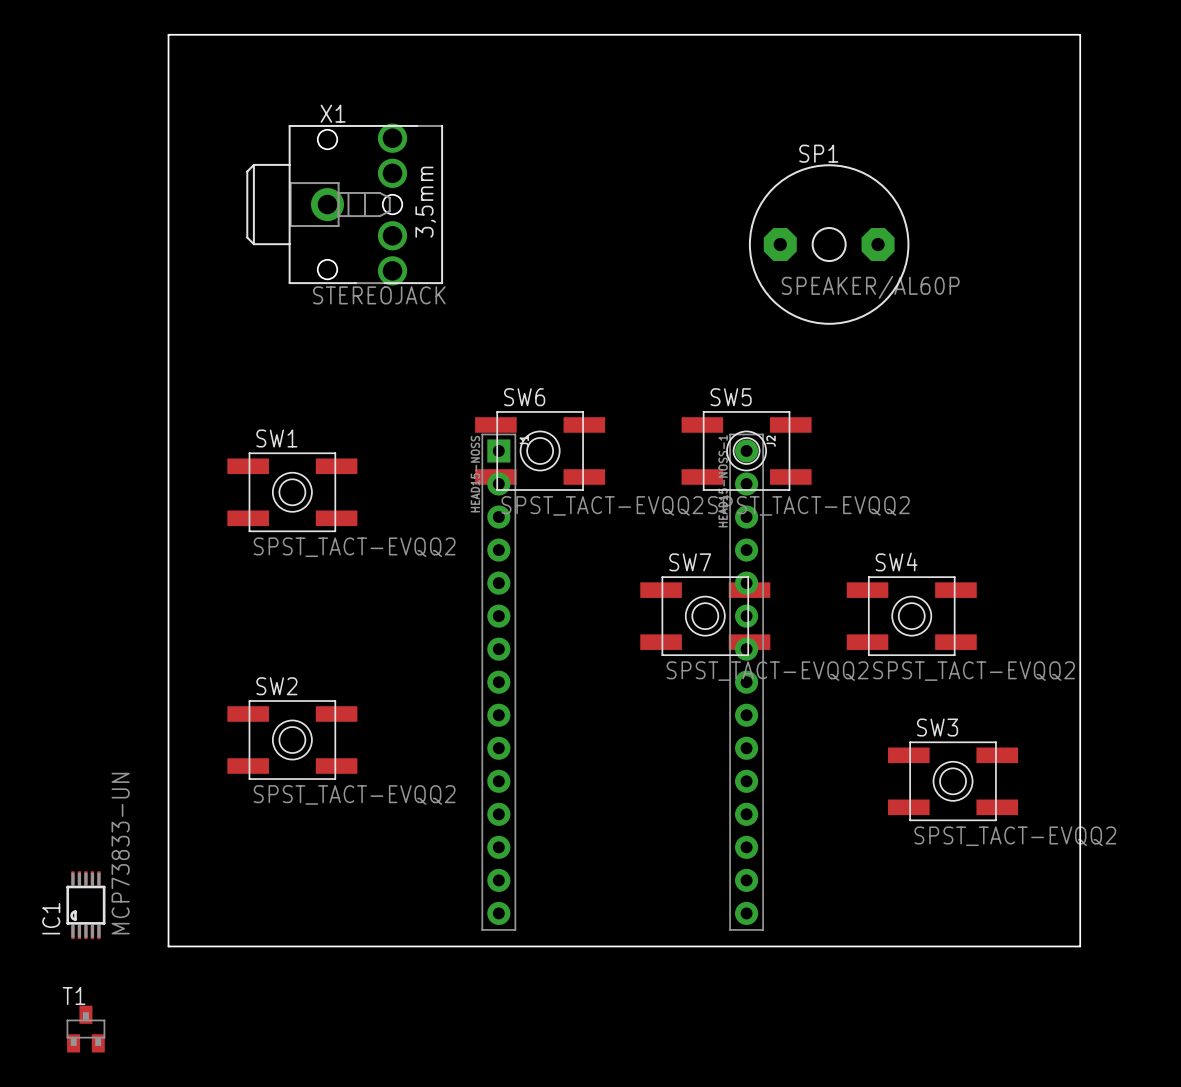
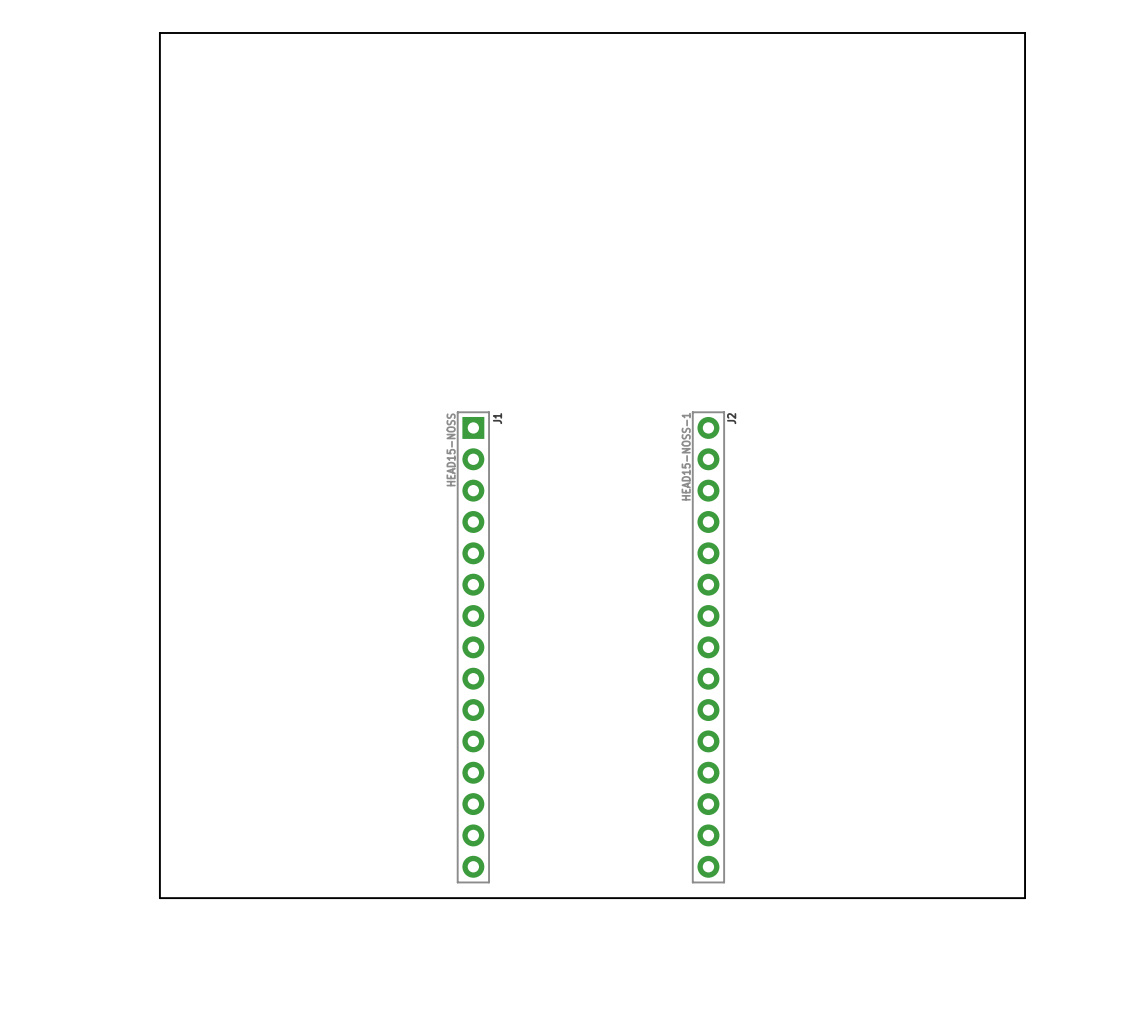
X1: STEREOJACK (344, 204) -> none
SP1: SPEAKER/AL60P (829, 244) -> none
SW6: SPST_TACT-EVQQ2 (540, 450) -> none
SW5: SPST_TACT-EVQQ2 (746, 450) -> none
SW1: SPST_TACT-EVQQ2 (292, 492) -> none
SW7: SPST_TACT-EVQQ2 (705, 616) -> none
SW4: SPST_TACT-EVQQ2 (911, 616) -> none
SW2: SPST_TACT-EVQQ2 (292, 740) -> none
SW3: SPST_TACT-EVQQ2 (953, 781) -> none
IC1: MCP73833-UN (85, 905) -> none
T1: (85, 1029) -> none

